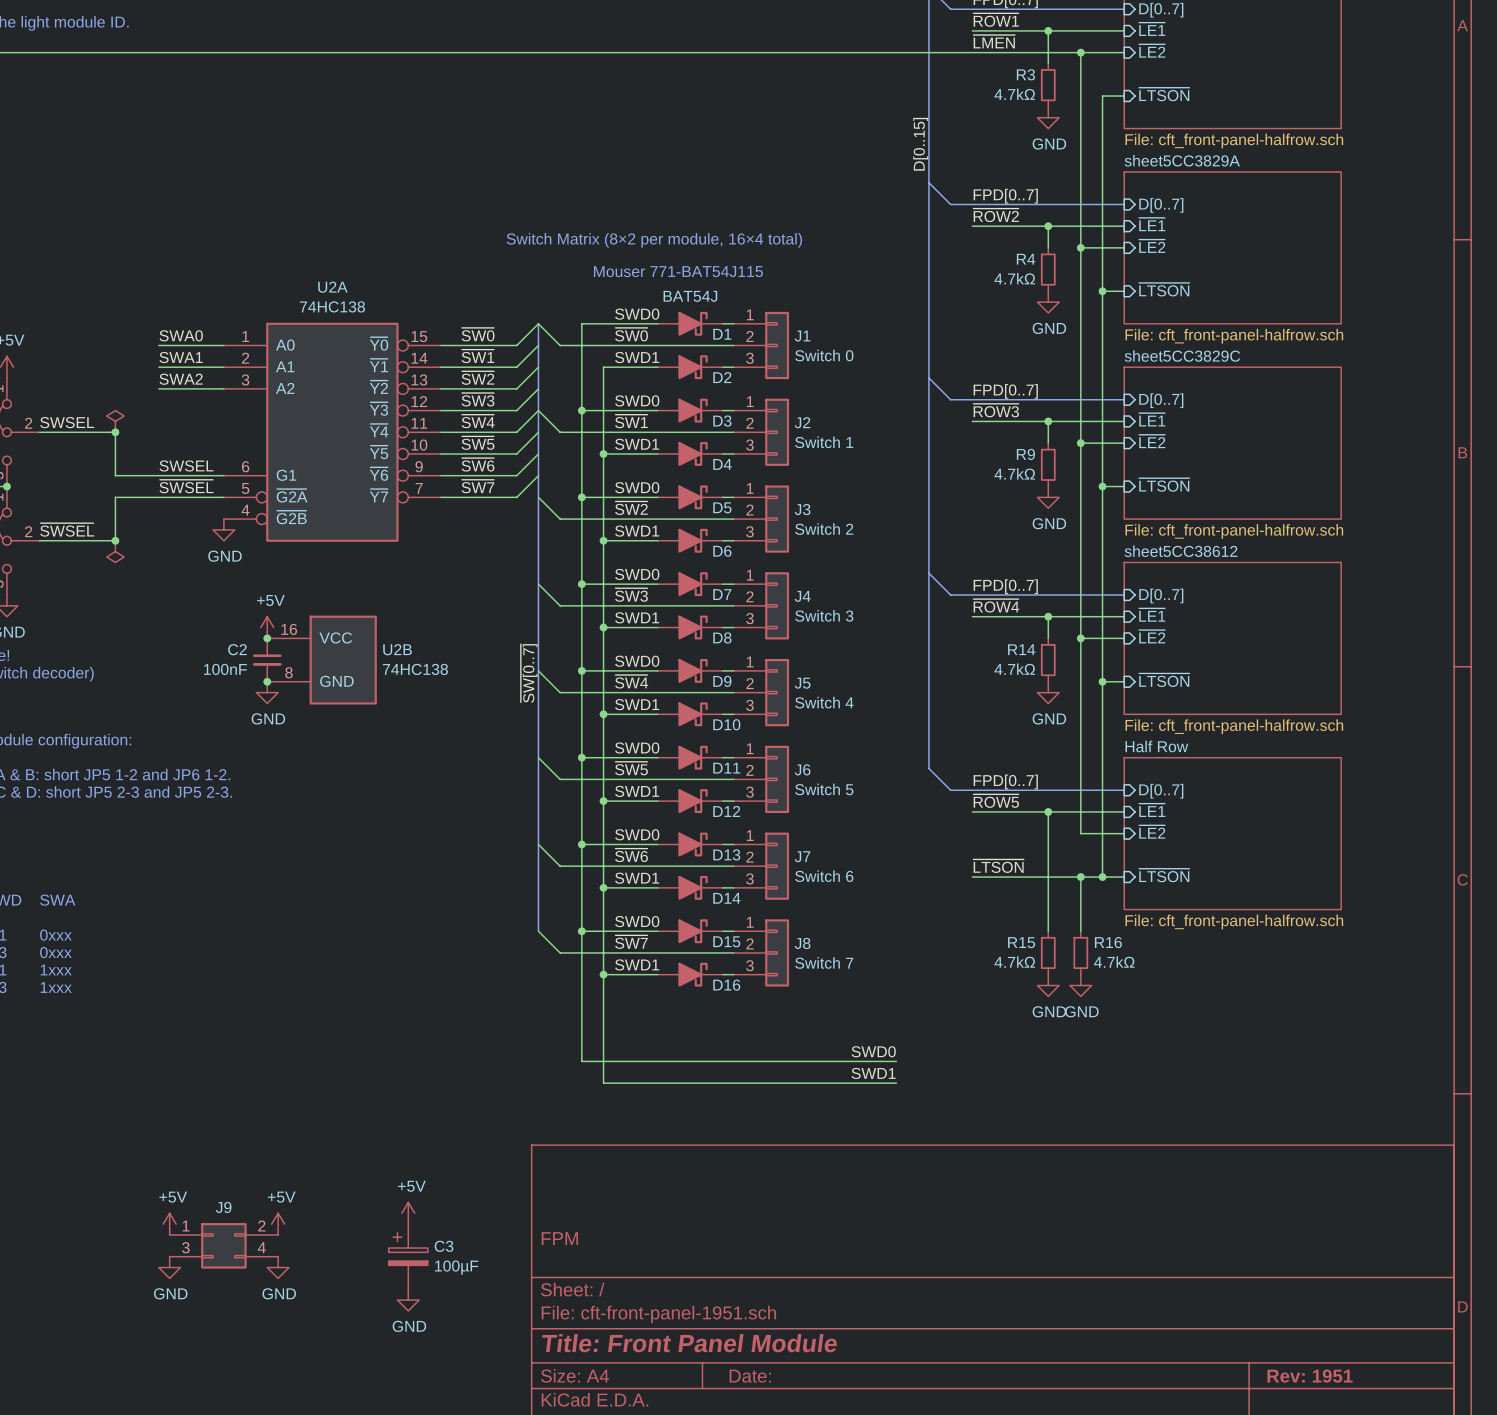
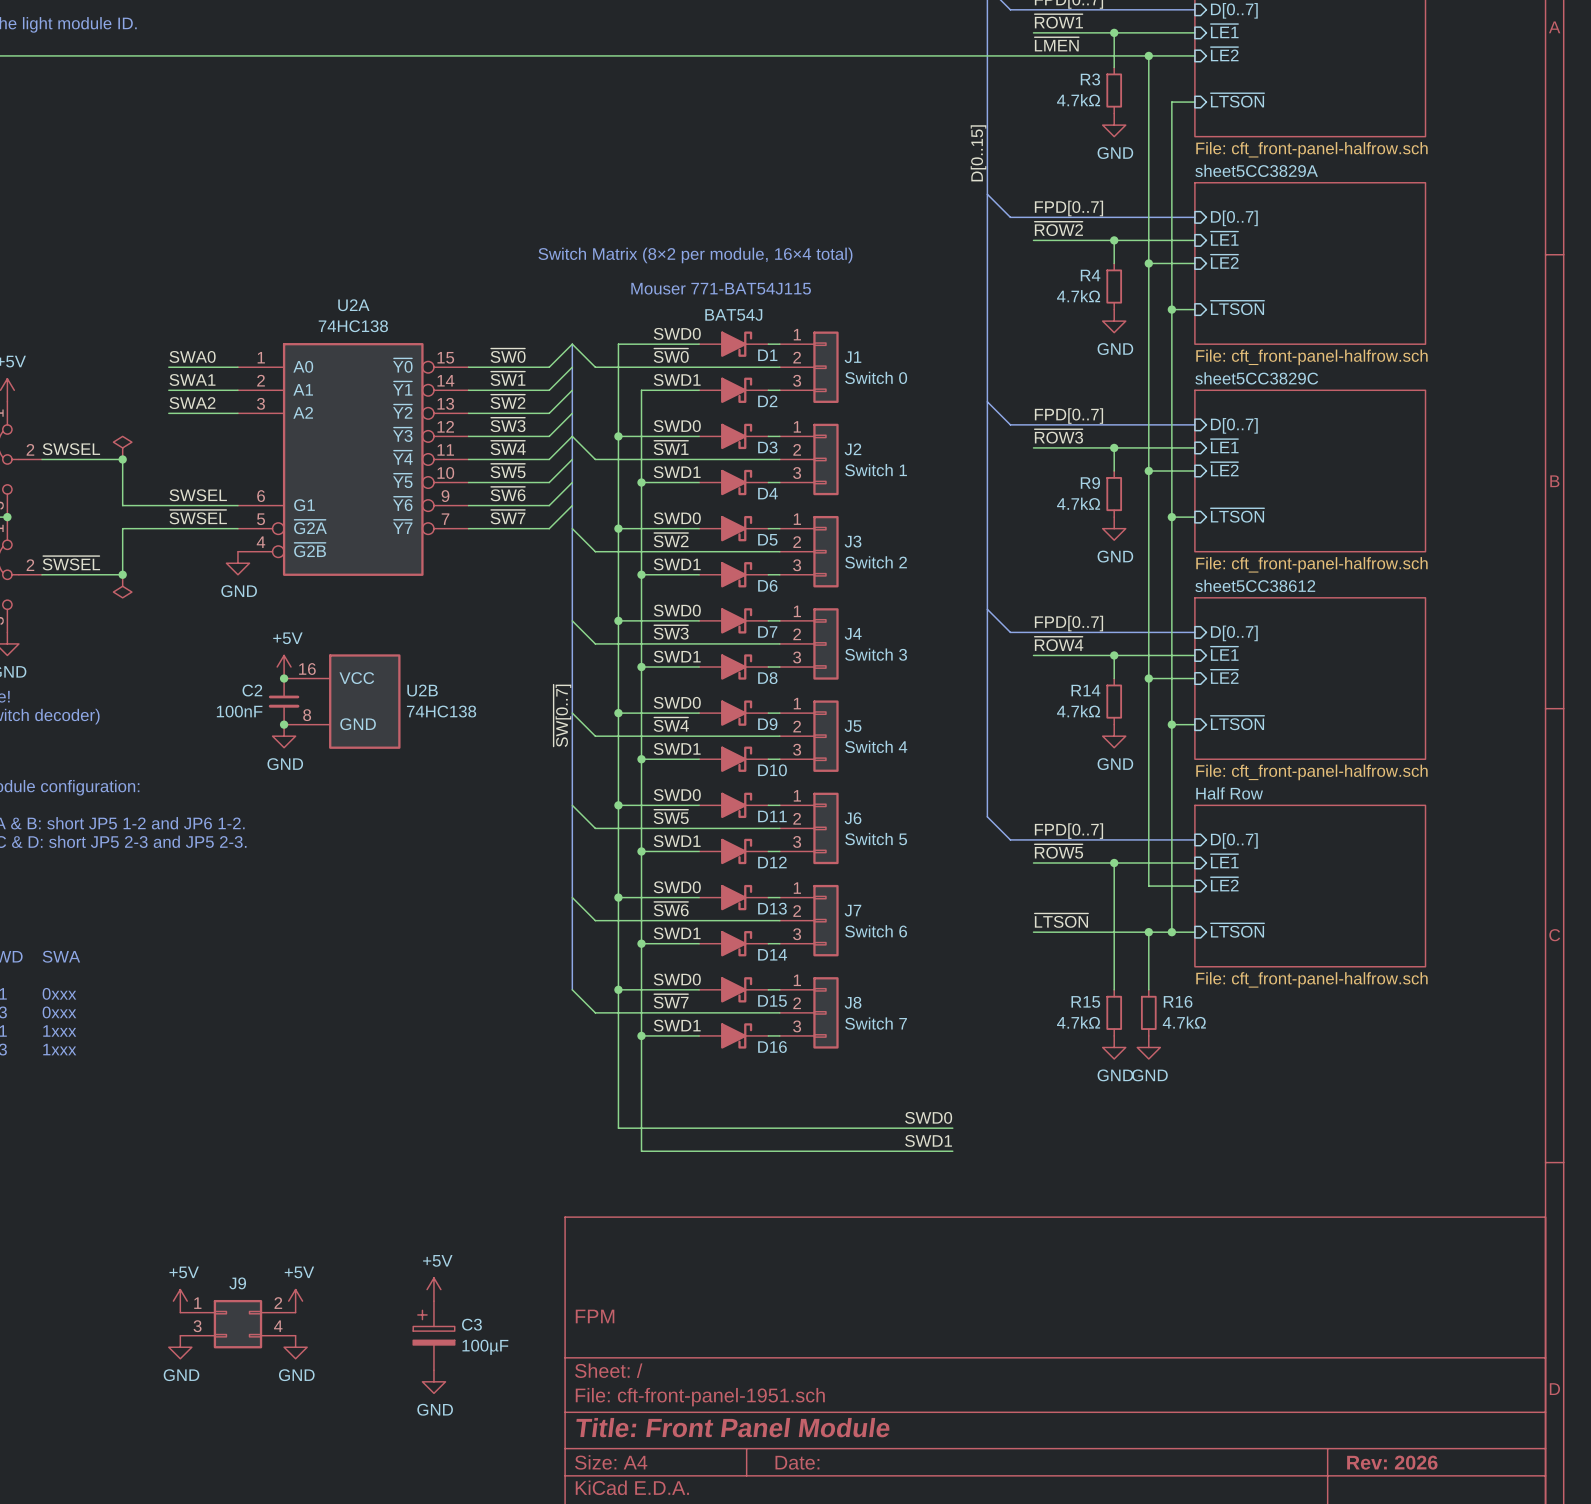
title block: Rev: 1951 (1310, 1376) -> Rev: 2026 (1392, 1462)

